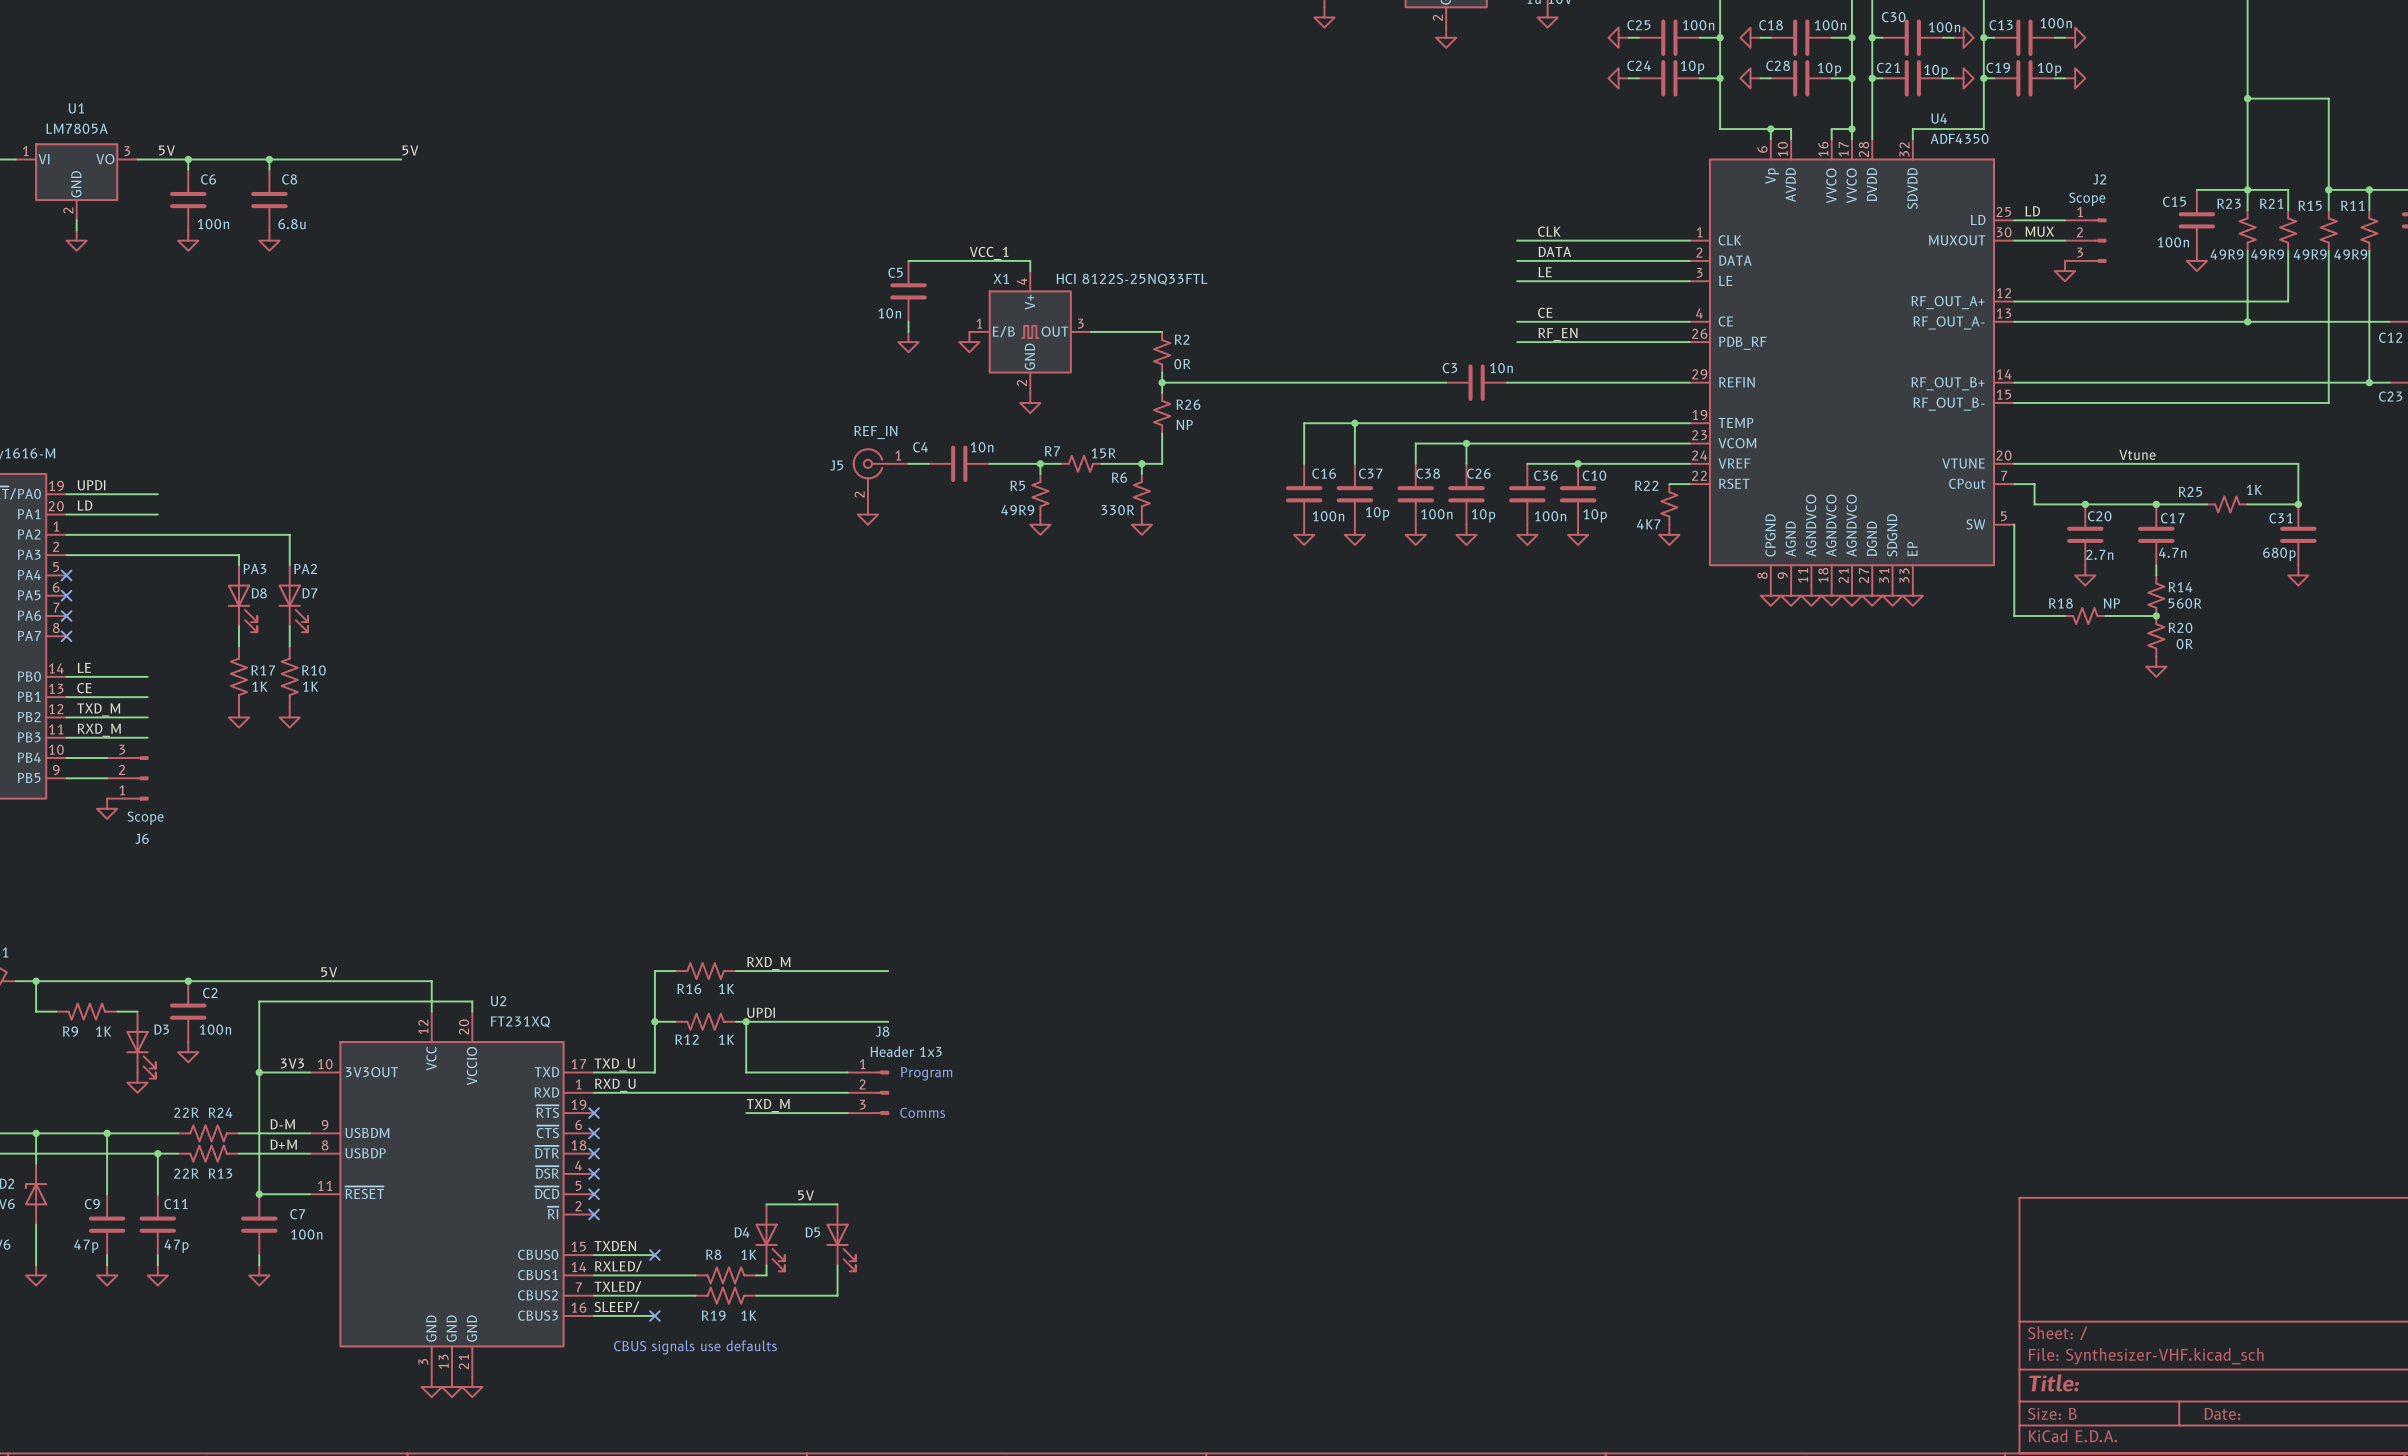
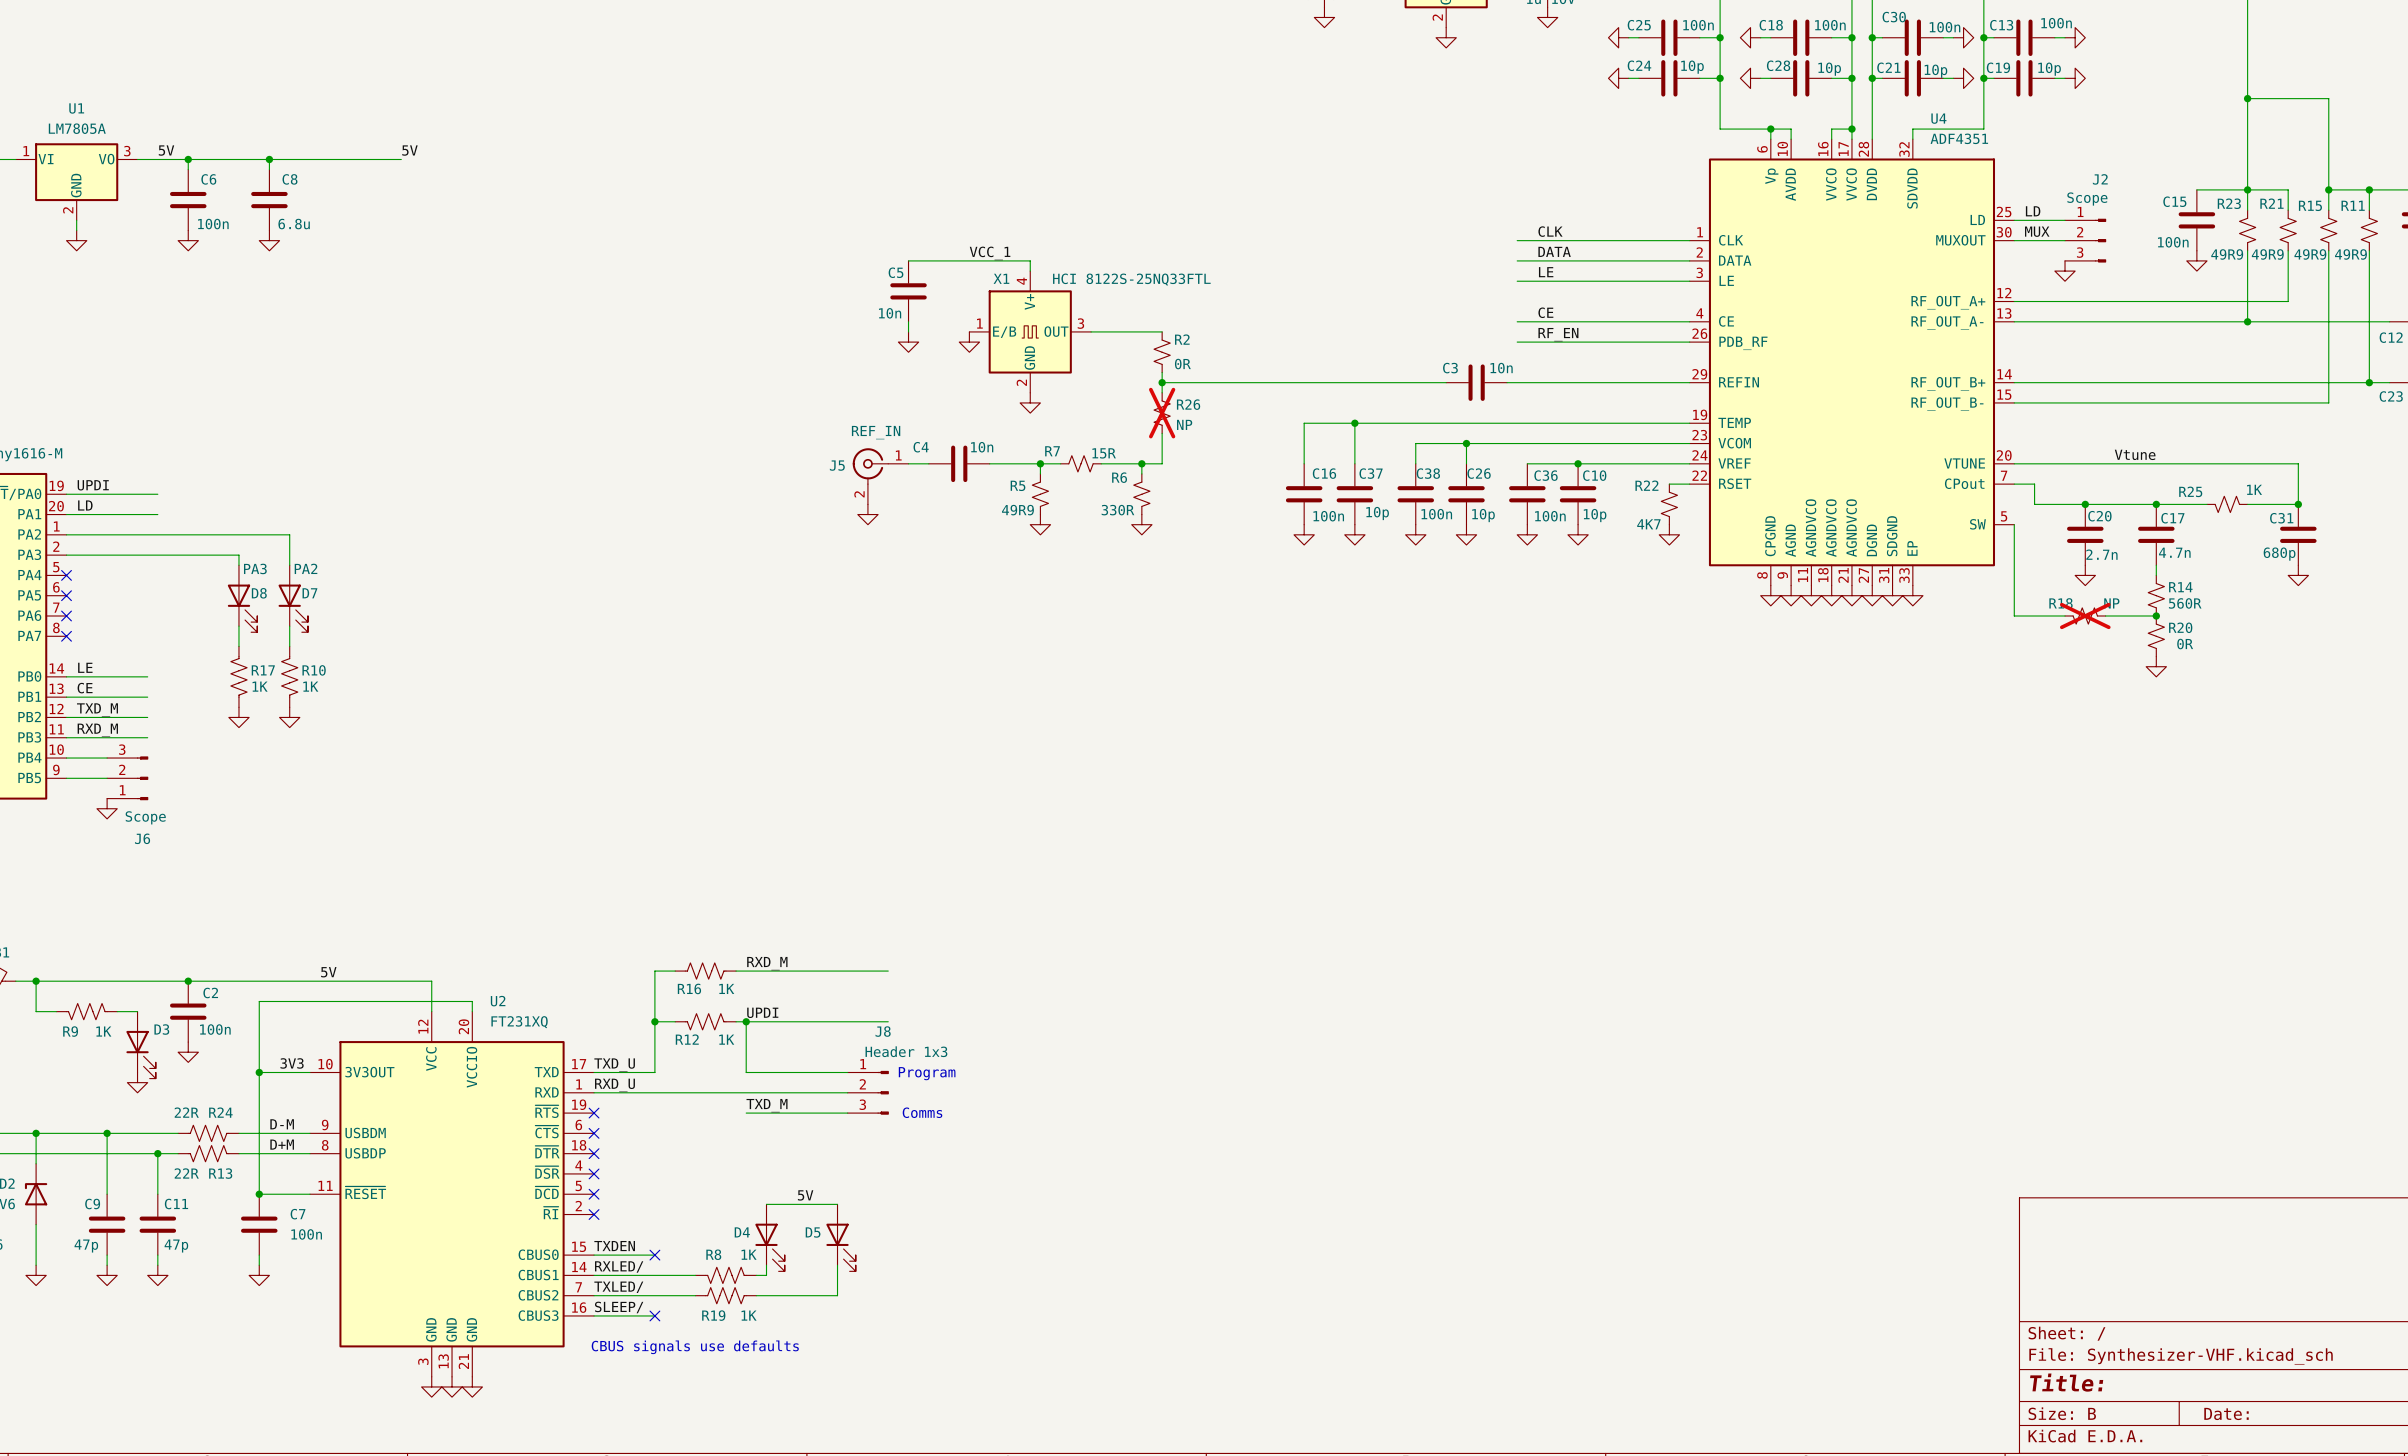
U4 value: ADF4350 (1959, 138) -> ADF4351 (1959, 138)
R26 do-not-place cross: none -> (1162, 413)
R18 do-not-place cross: none -> (2085, 615)

